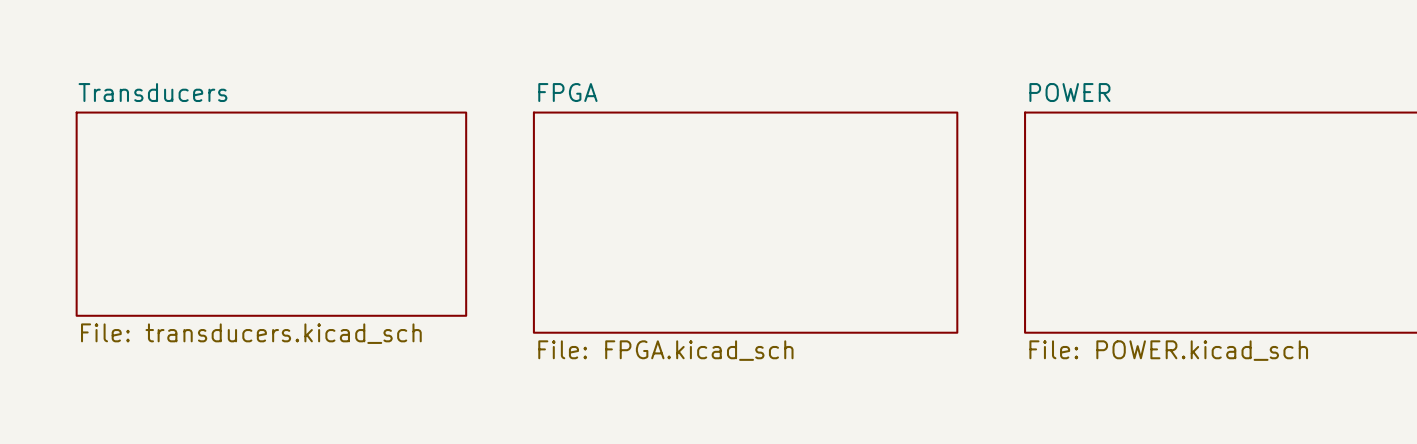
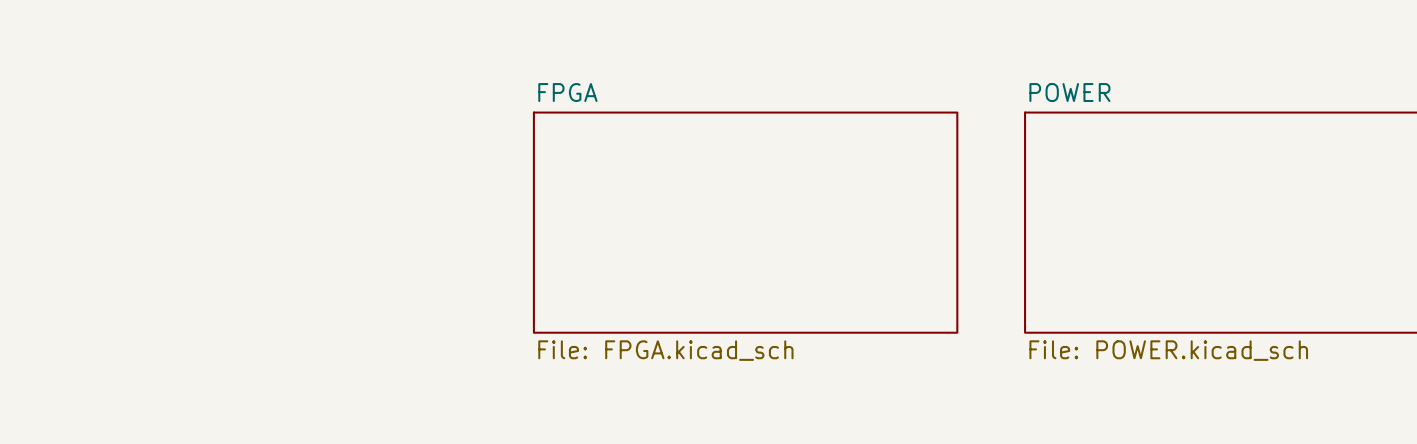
sheet Transducers: File: transducers.kicad_sch (271, 214) -> none

